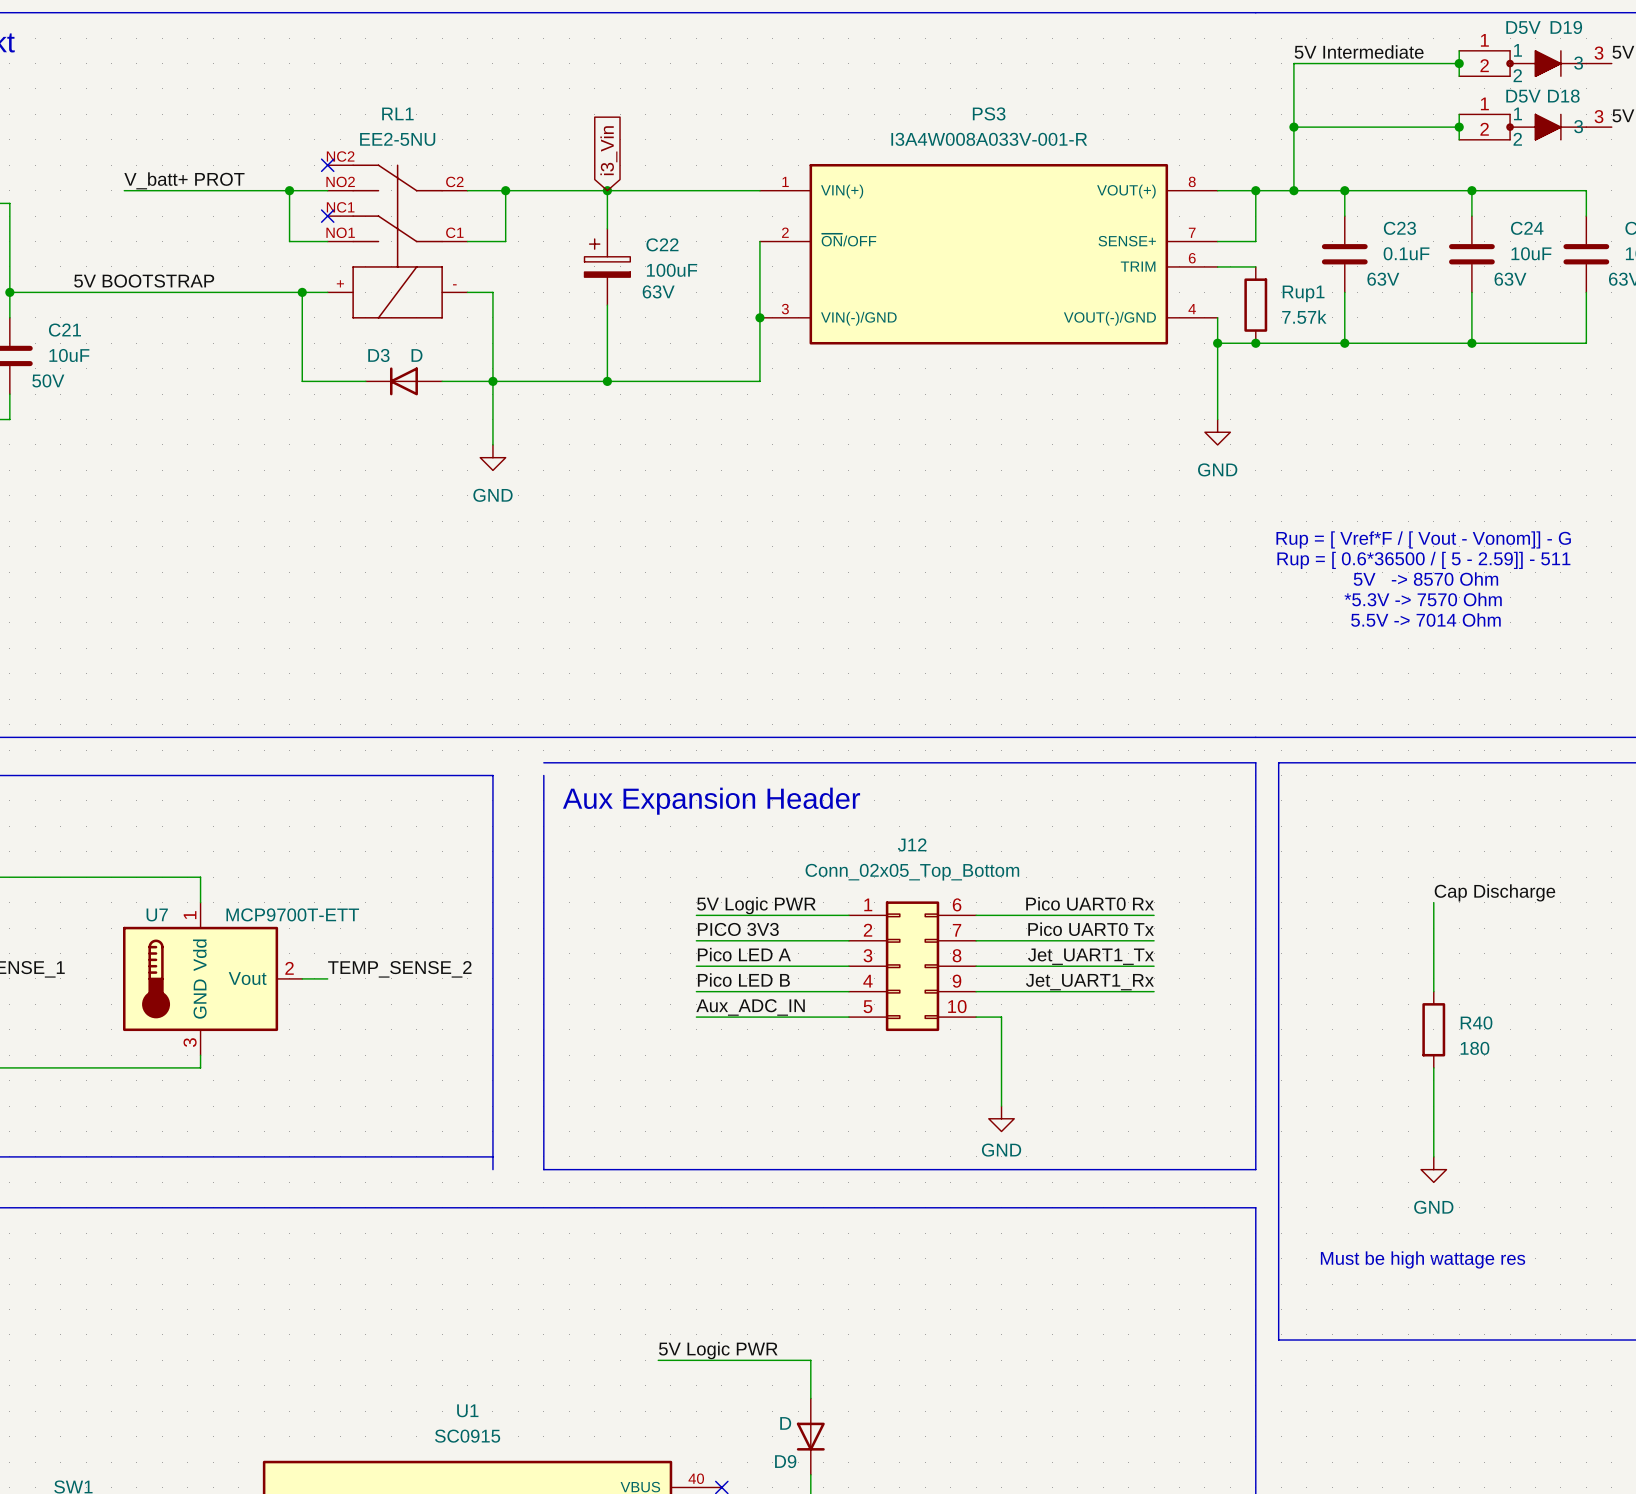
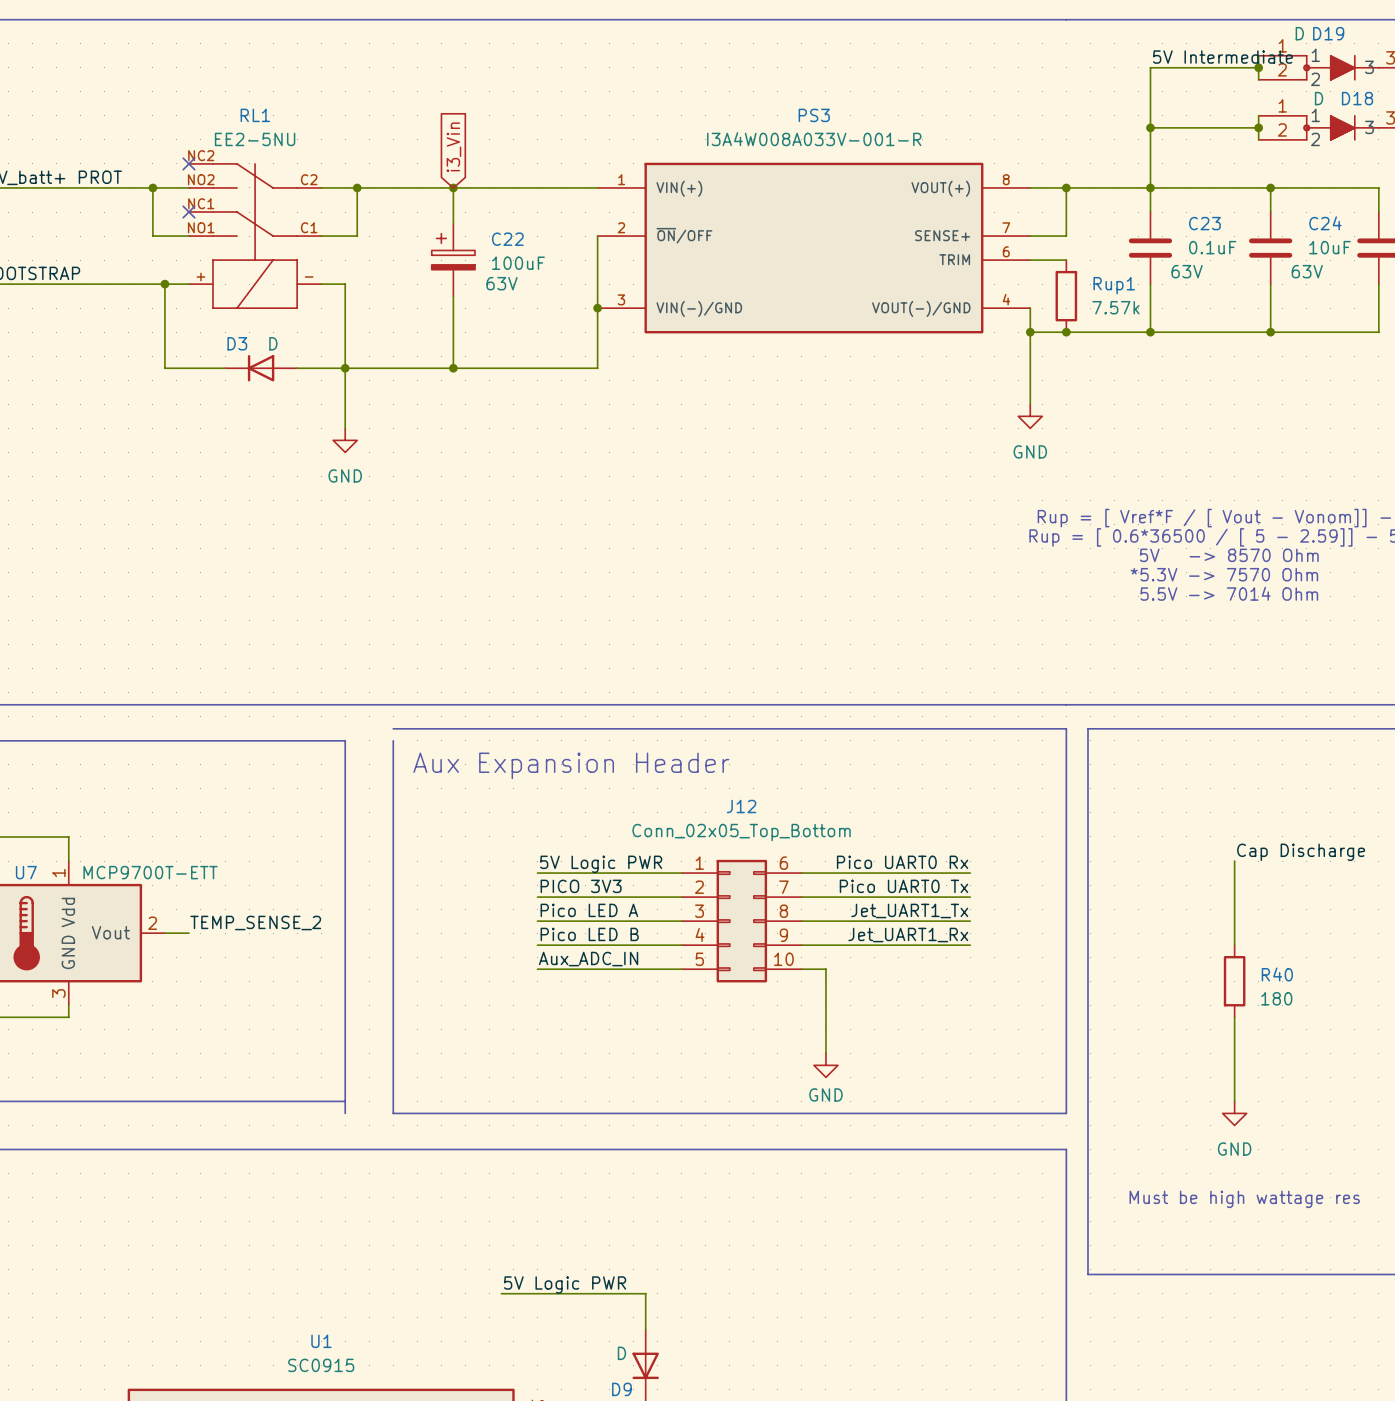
D19 value: D5V (1523, 27) -> D (1299, 33)
D19 name position: D19 (1566, 27) -> D19 (1328, 33)
label position: 5V Intermediate (1359, 51) -> 5V Intermediate (1222, 57)
wire: (1344, 63) (1293, 63) (1293, 190) -> (1150, 67) (1150, 187)
D18 value: D5V (1523, 96) -> D (1319, 98)
wire: (1293, 127) (1344, 127) -> none
junction: (1293, 127) -> none
junction: none -> (1150, 127)
junction: (1293, 190) -> none

